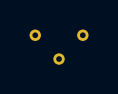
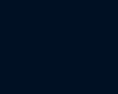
part: (59, 47) -> none

